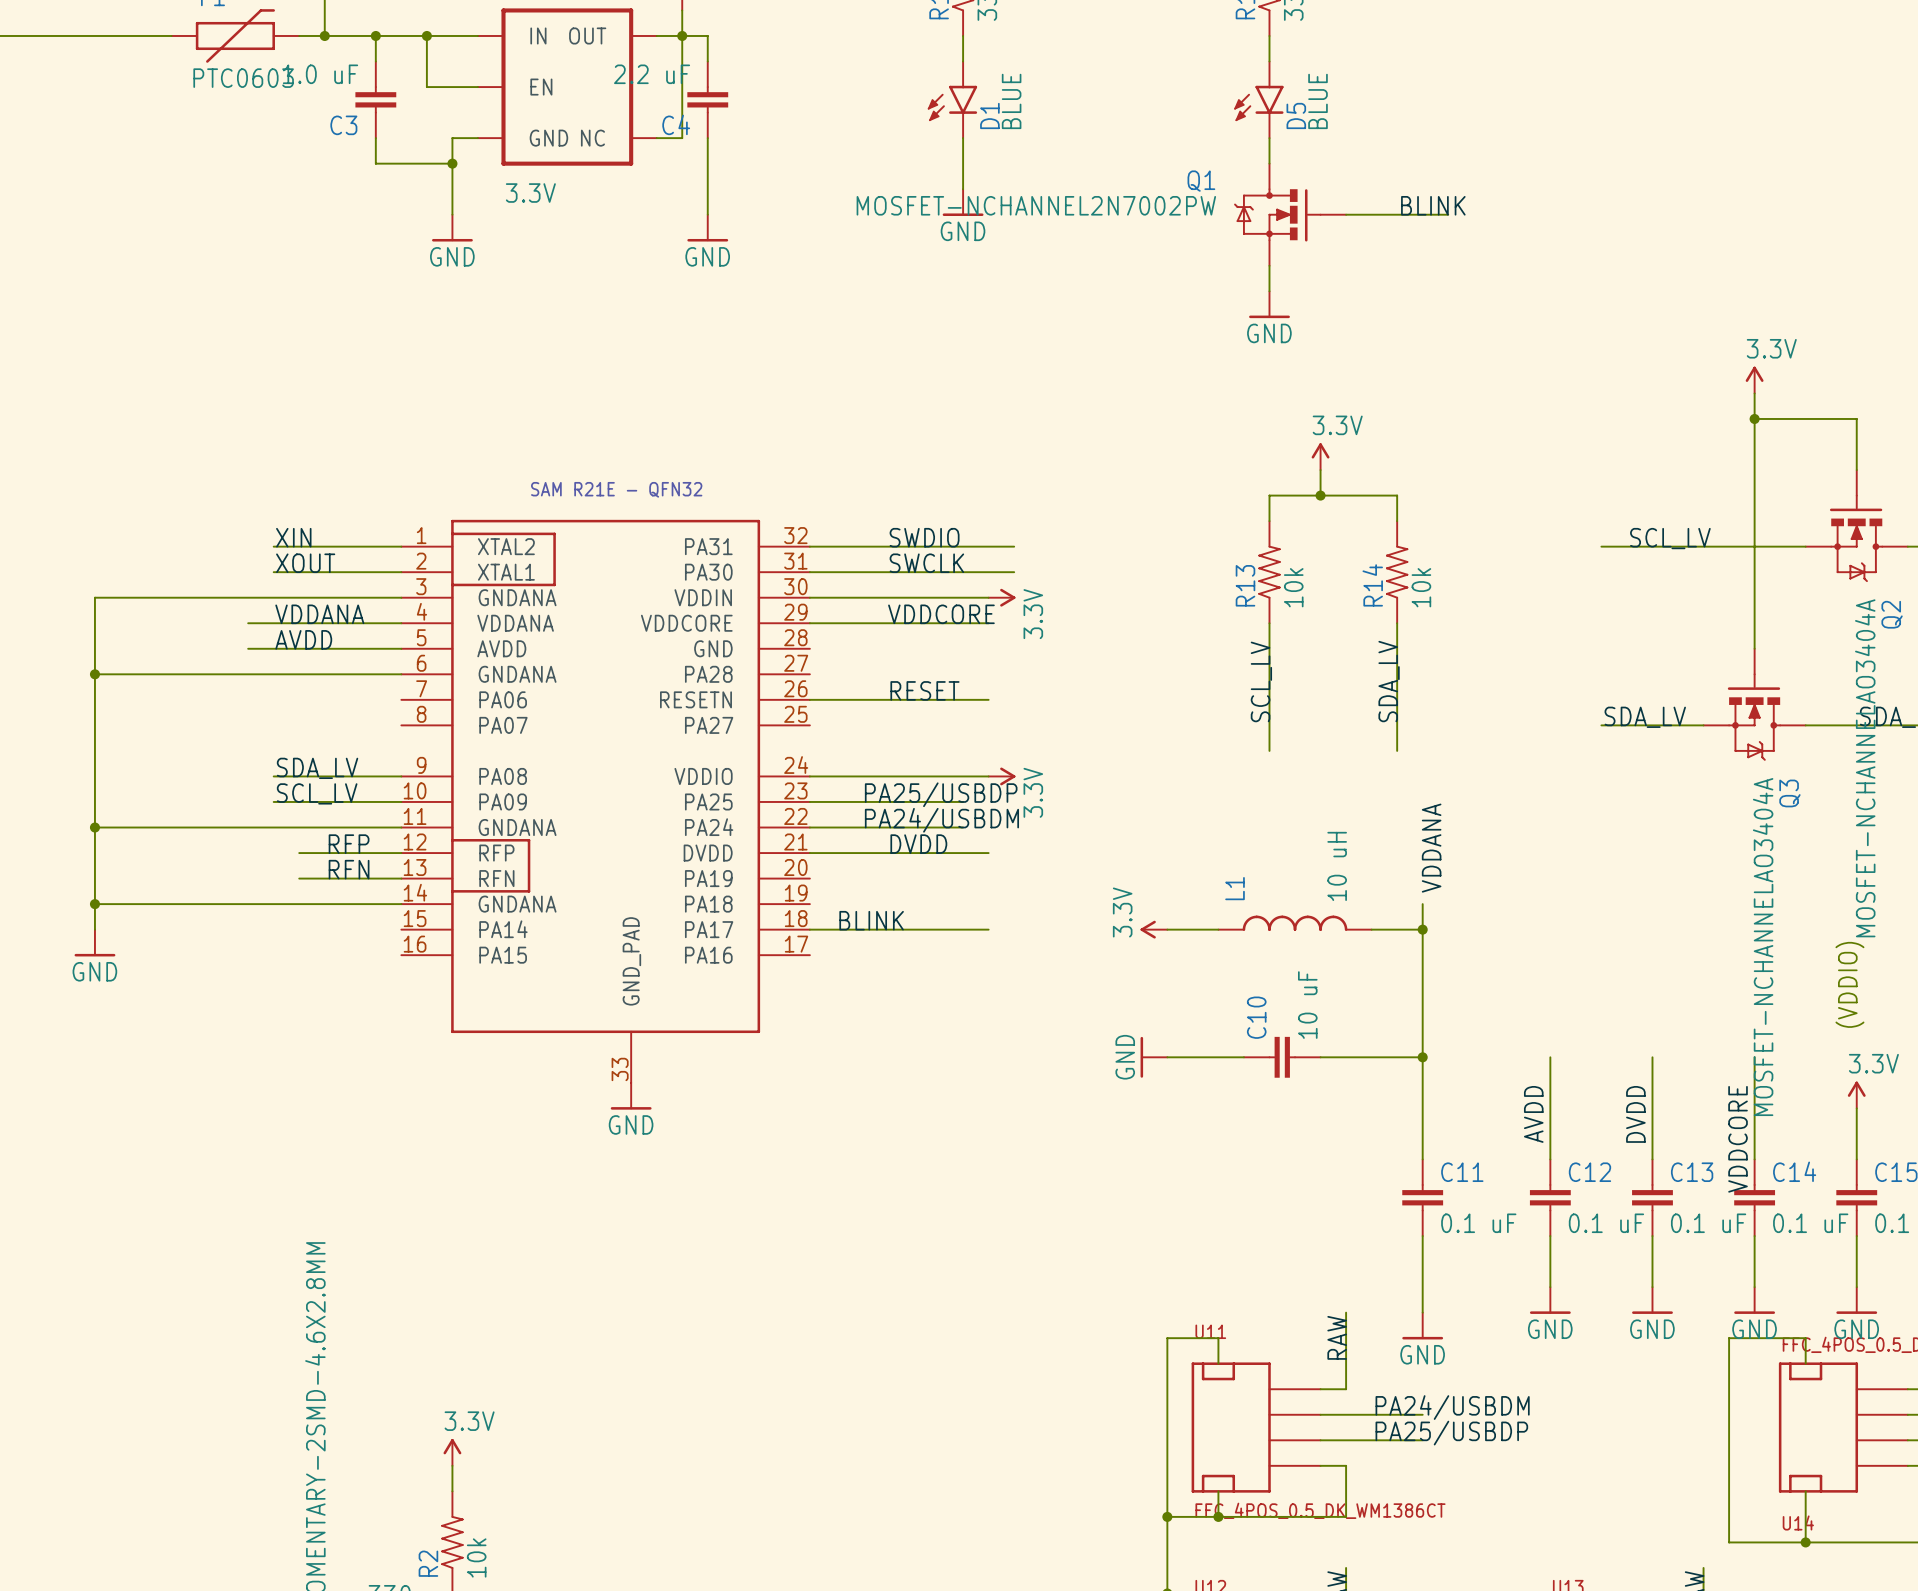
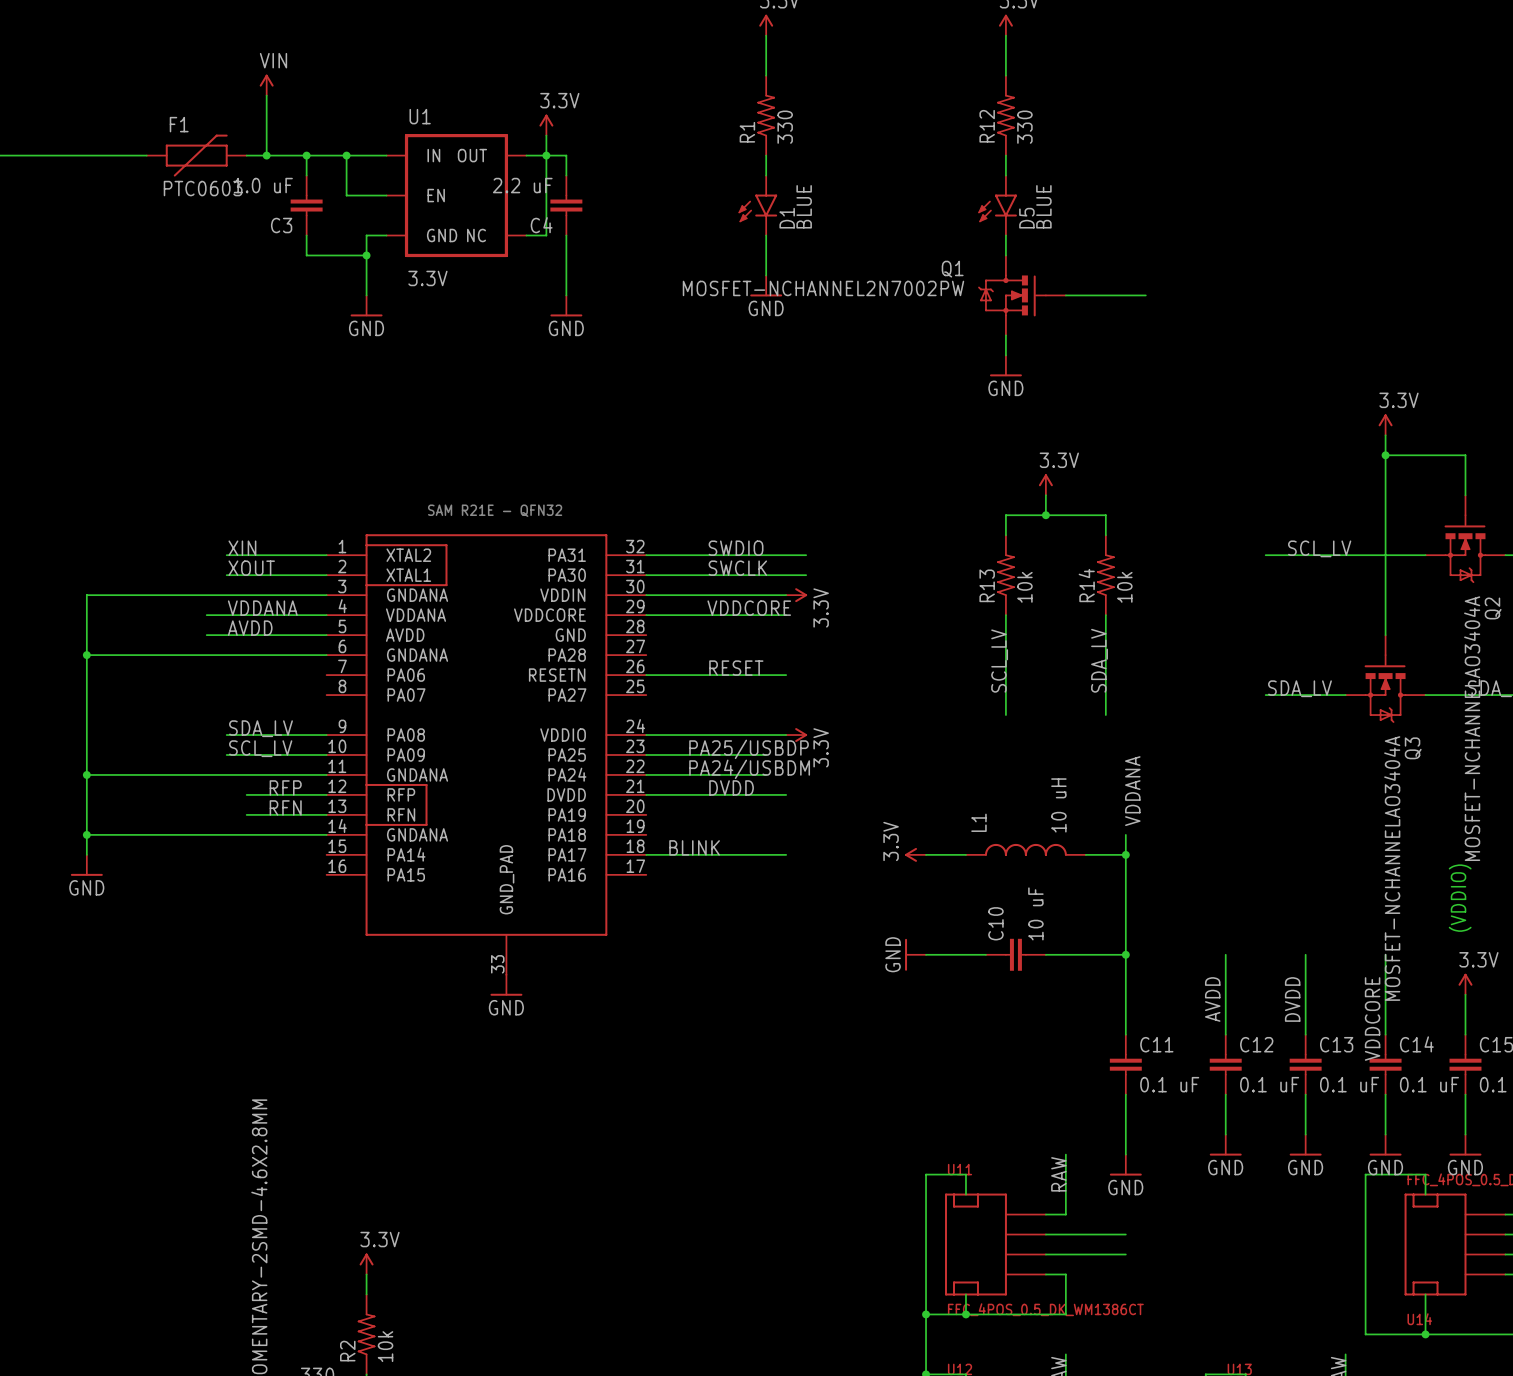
label: BLINK (1433, 205) -> none
label: PA24/USBDM (1452, 1407) -> none
label: PA25/USBDP (1451, 1433) -> none

